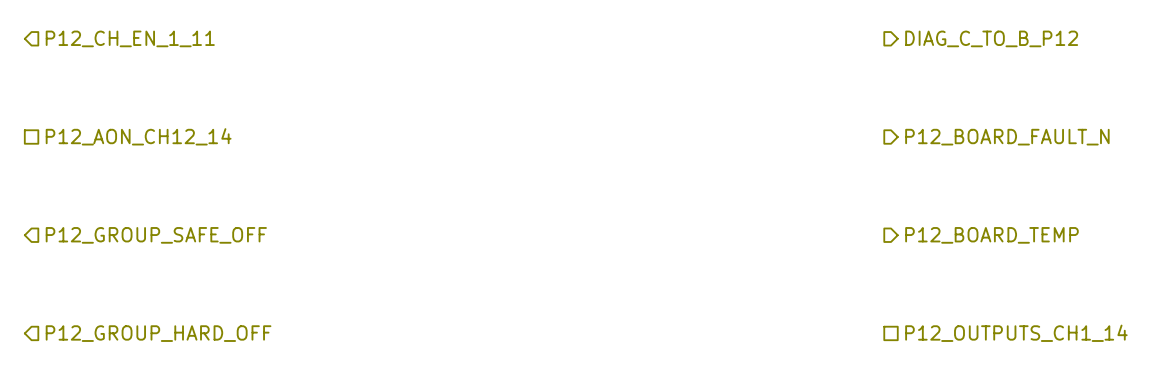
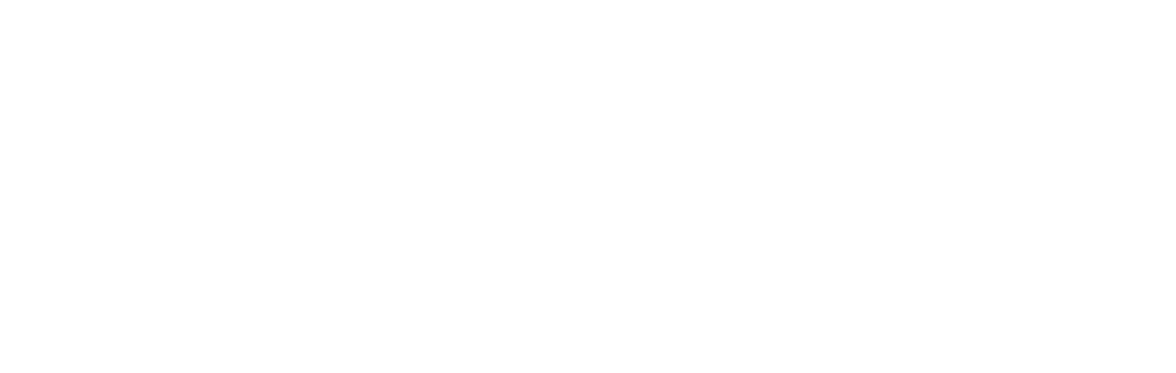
hierarchical label: P12_CH_EN_1_11 (130, 38) -> none
hierarchical label: DIAG_C_TO_B_P12 (991, 38) -> none
hierarchical label: P12_AON_CH12_14 (138, 136) -> none
hierarchical label: P12_BOARD_FAULT_N (1007, 137) -> none
hierarchical label: P12_GROUP_SAFE_OFF (156, 235) -> none
hierarchical label: P12_BOARD_TEMP (991, 235) -> none
hierarchical label: P12_GROUP_HARD_OFF (158, 333) -> none
hierarchical label: P12_OUTPUTS_CH1_14 (1016, 333) -> none

